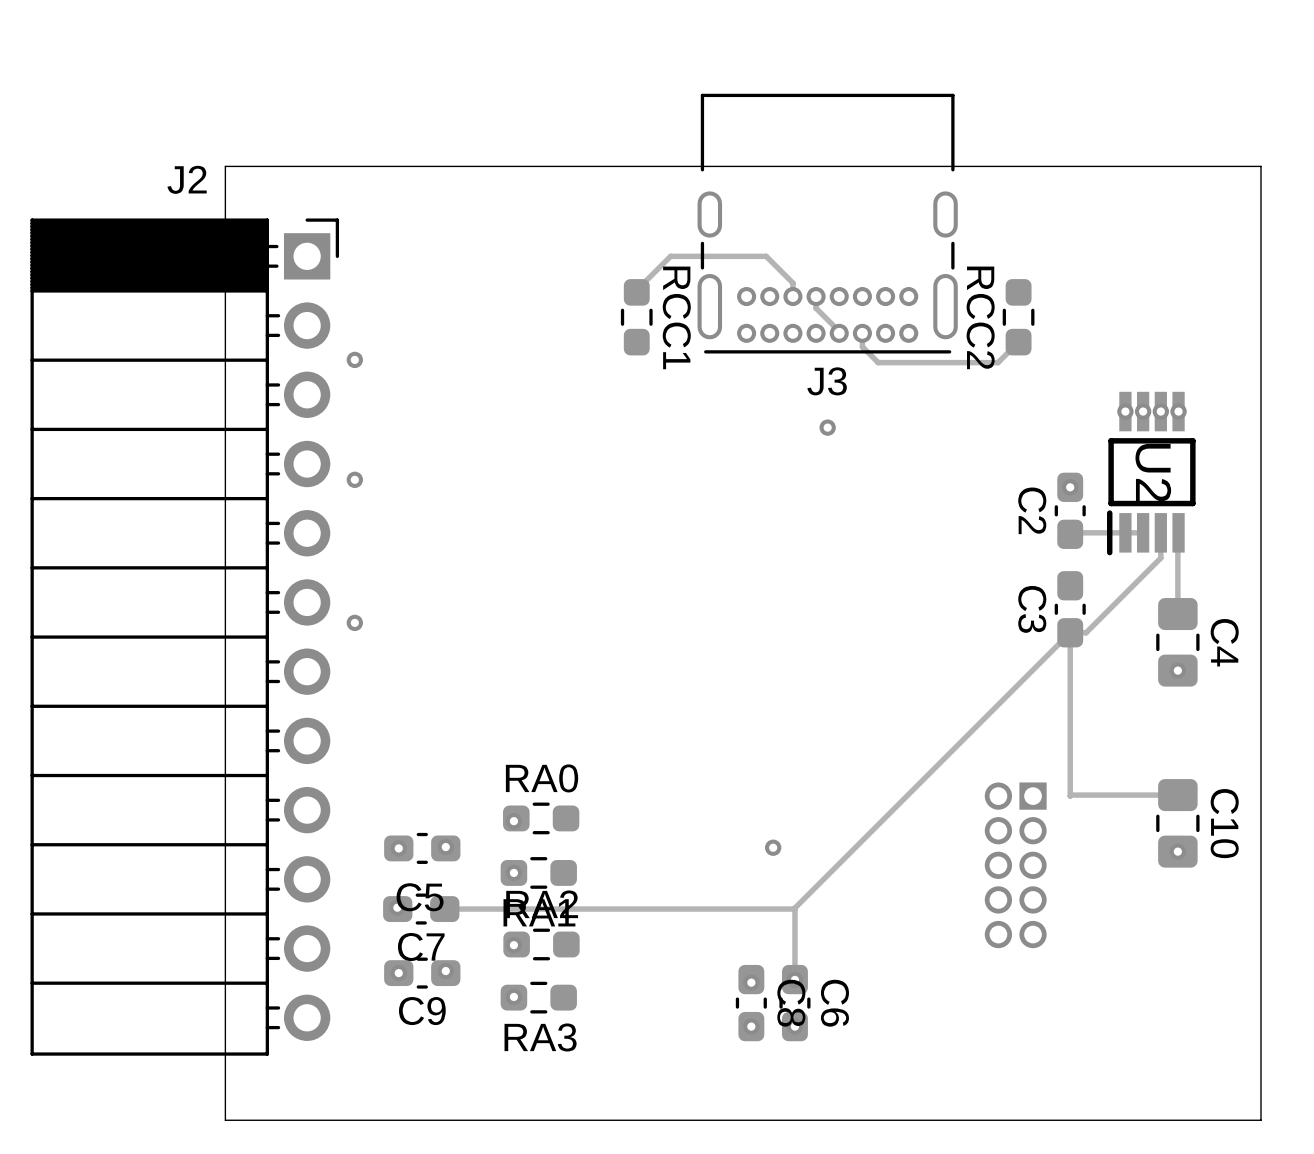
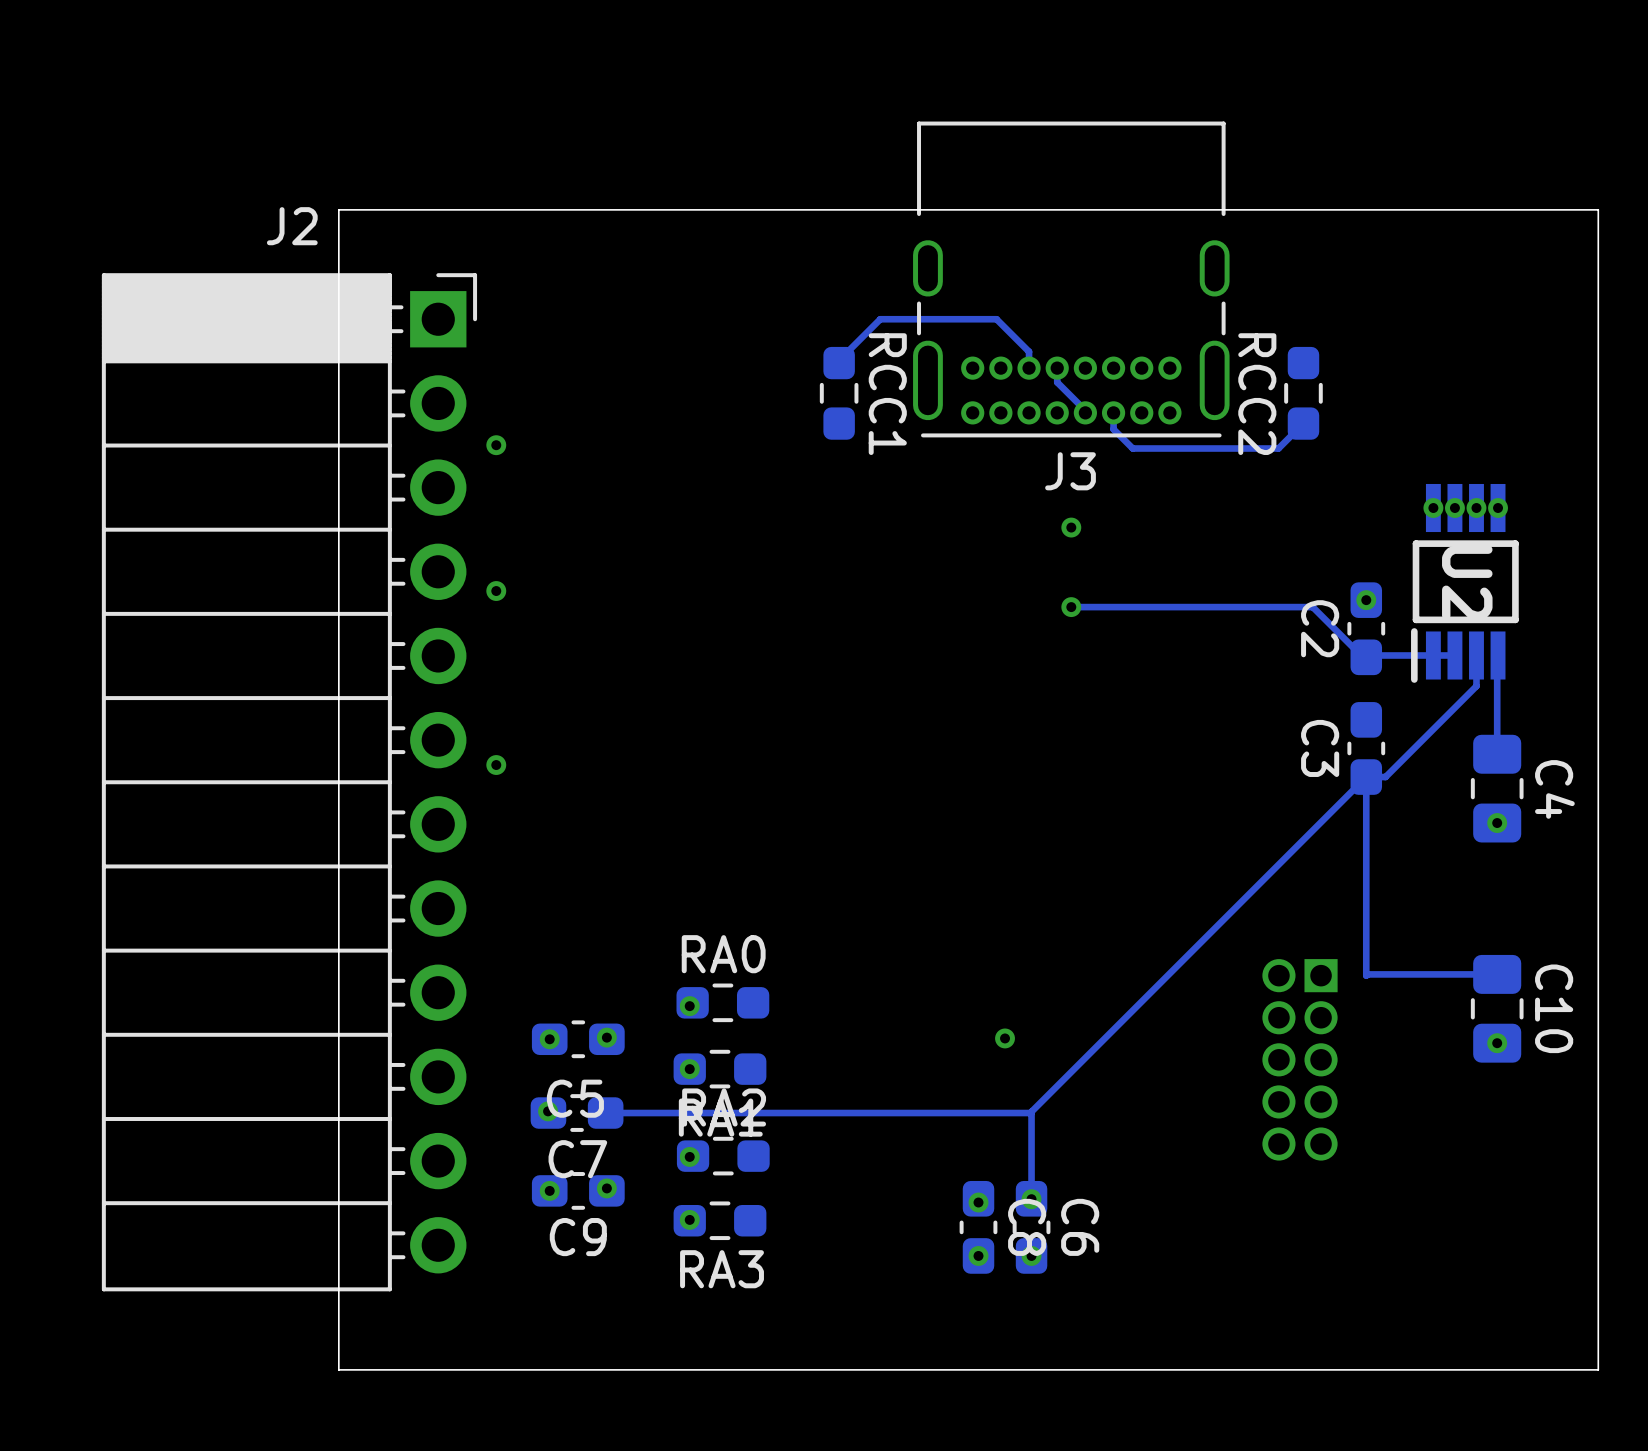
track: none -> (1071, 607) (1312, 607) (1362, 657) (1366, 657)
via: none -> (1071, 607)

